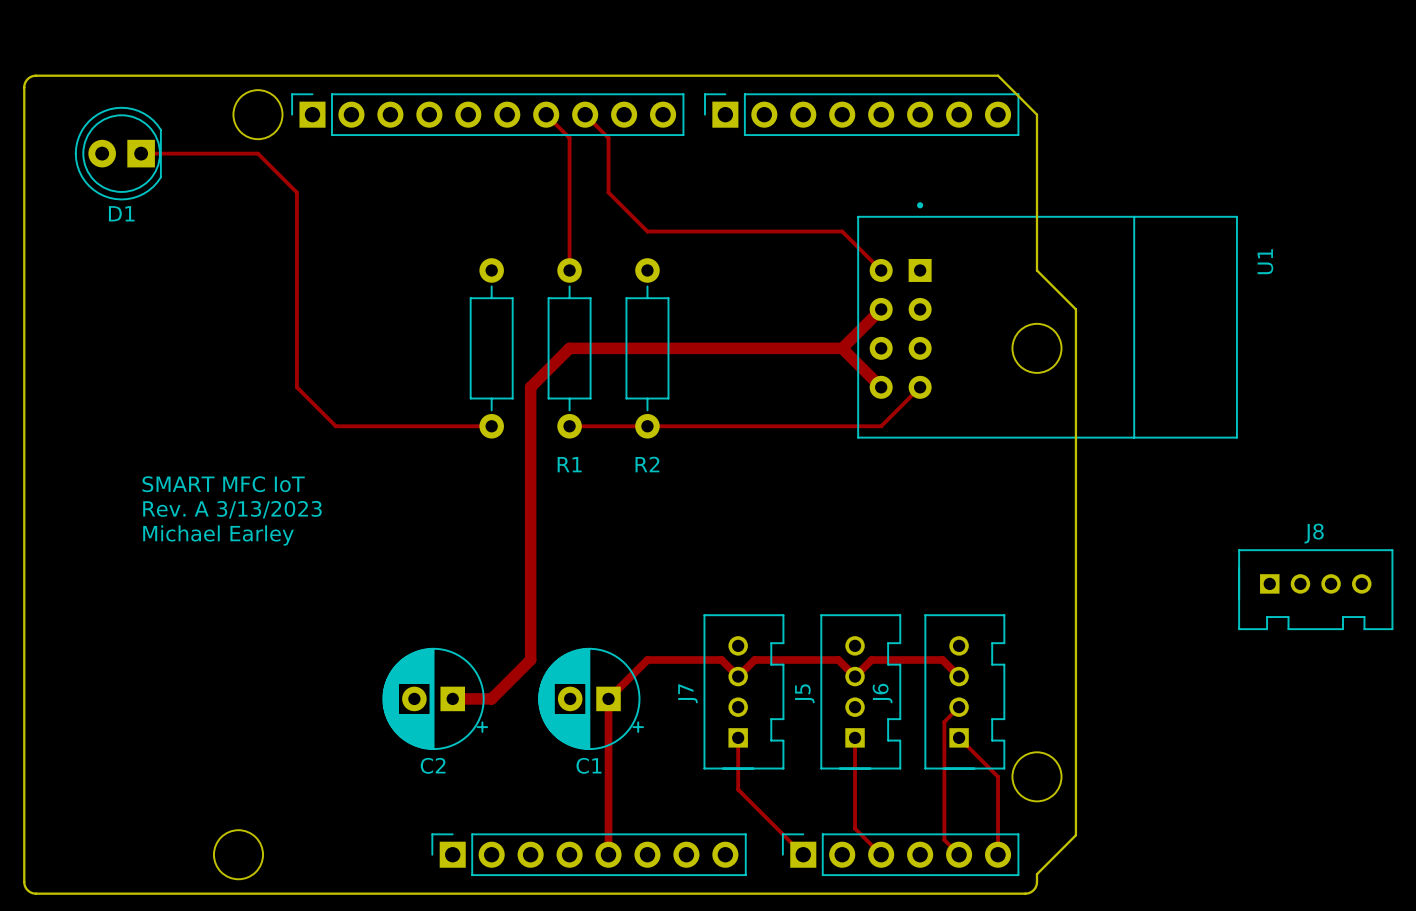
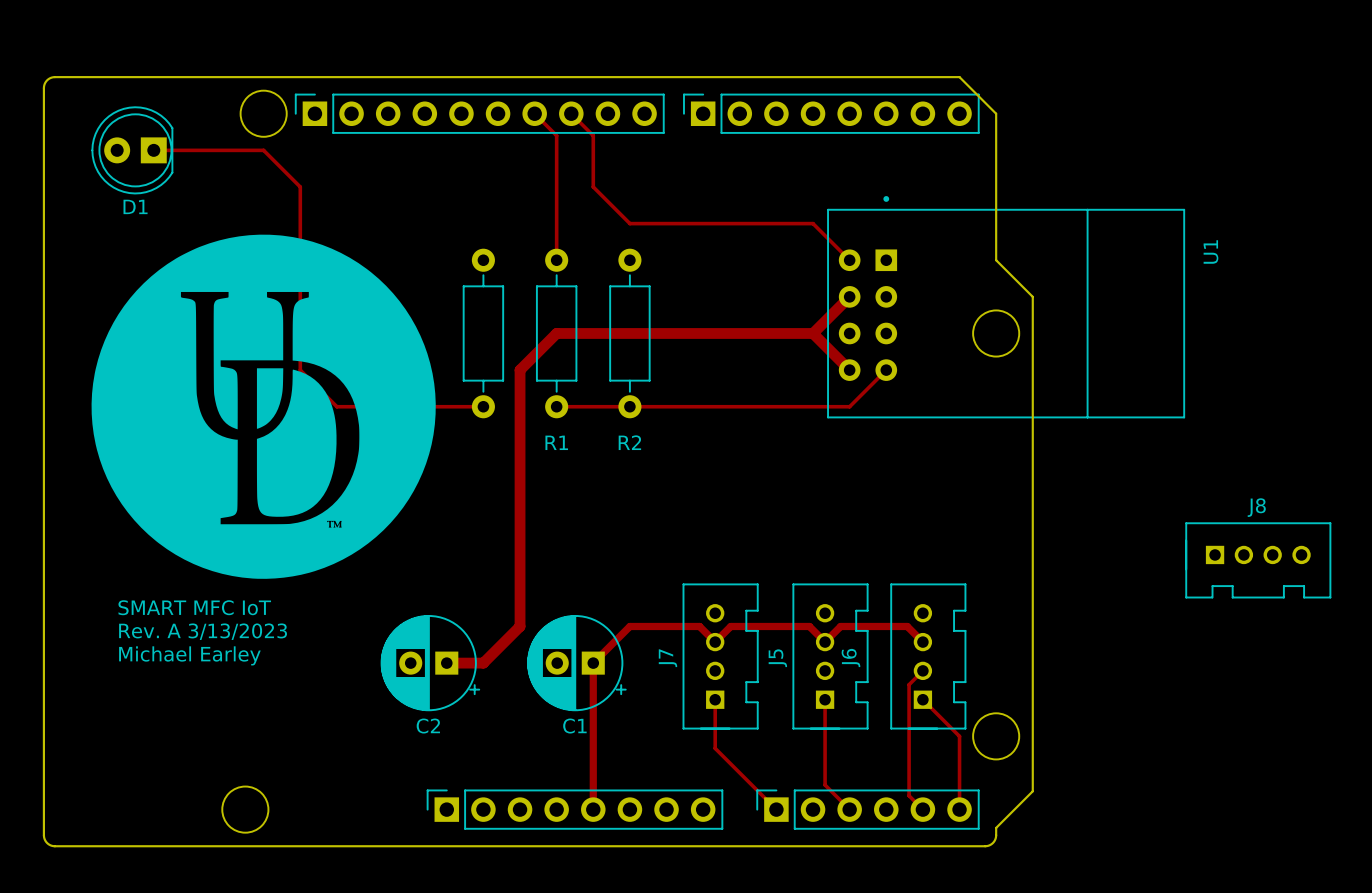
drawing: none -> [91, 234, 436, 579]
text position: SMART MFC IoT (223, 484) -> SMART MFC IoT (194, 607)
text position: Rev. A 3/13/2023 (232, 509) -> Rev. A 3/13/2023 (203, 631)
text position: Michael Earley (218, 535) -> Michael Earley (189, 655)

